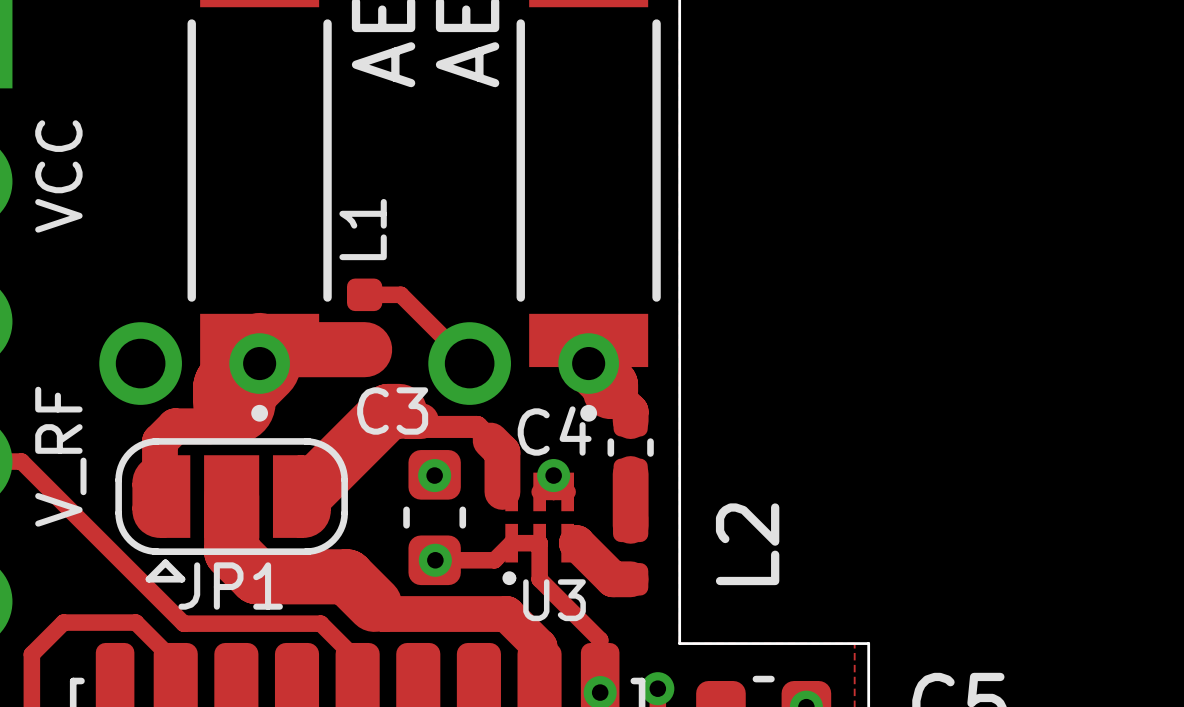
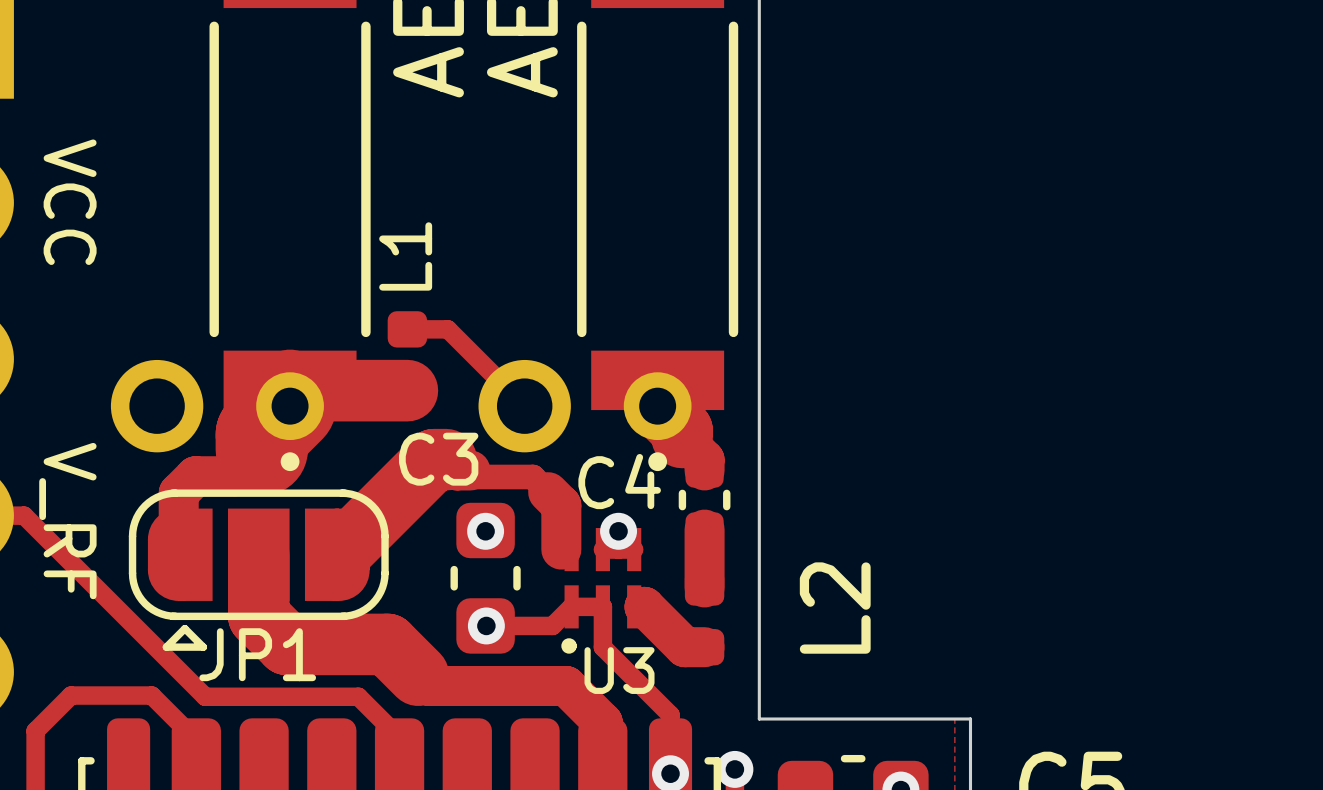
text rotation: 0° (58, 176) -> 180° (70, 202)
text rotation: 0° (60, 456) -> 180° (67, 521)

